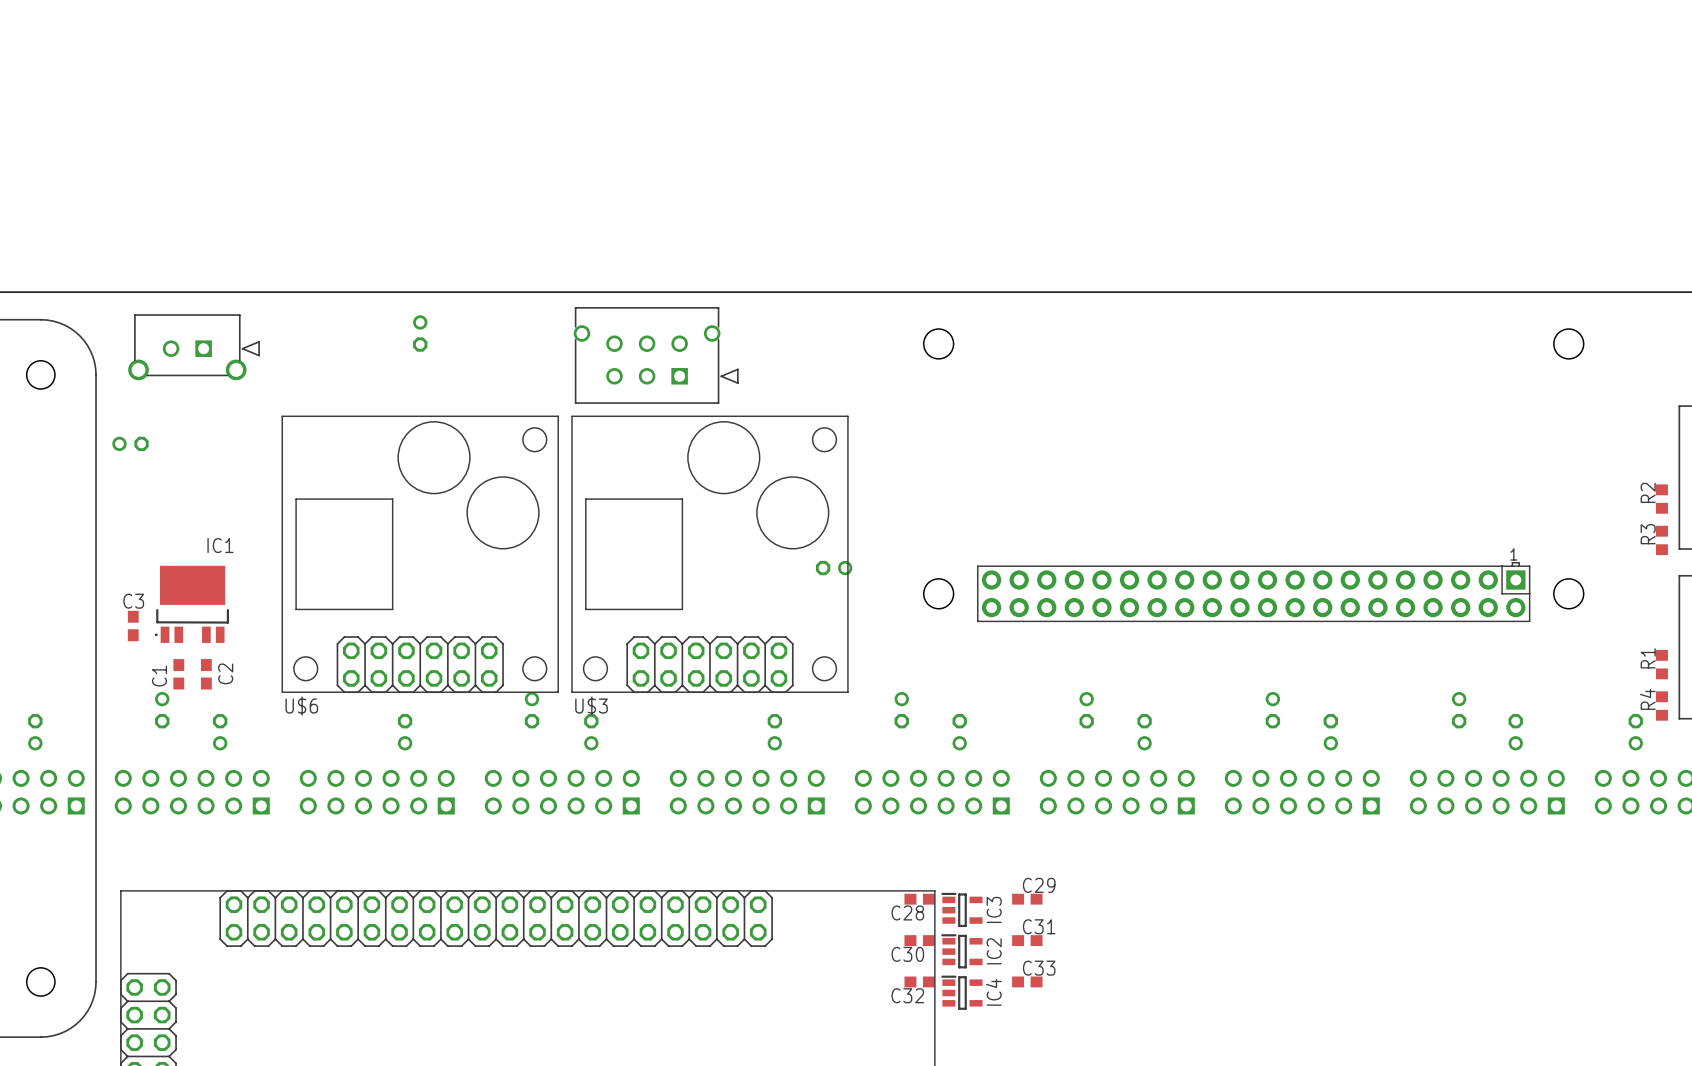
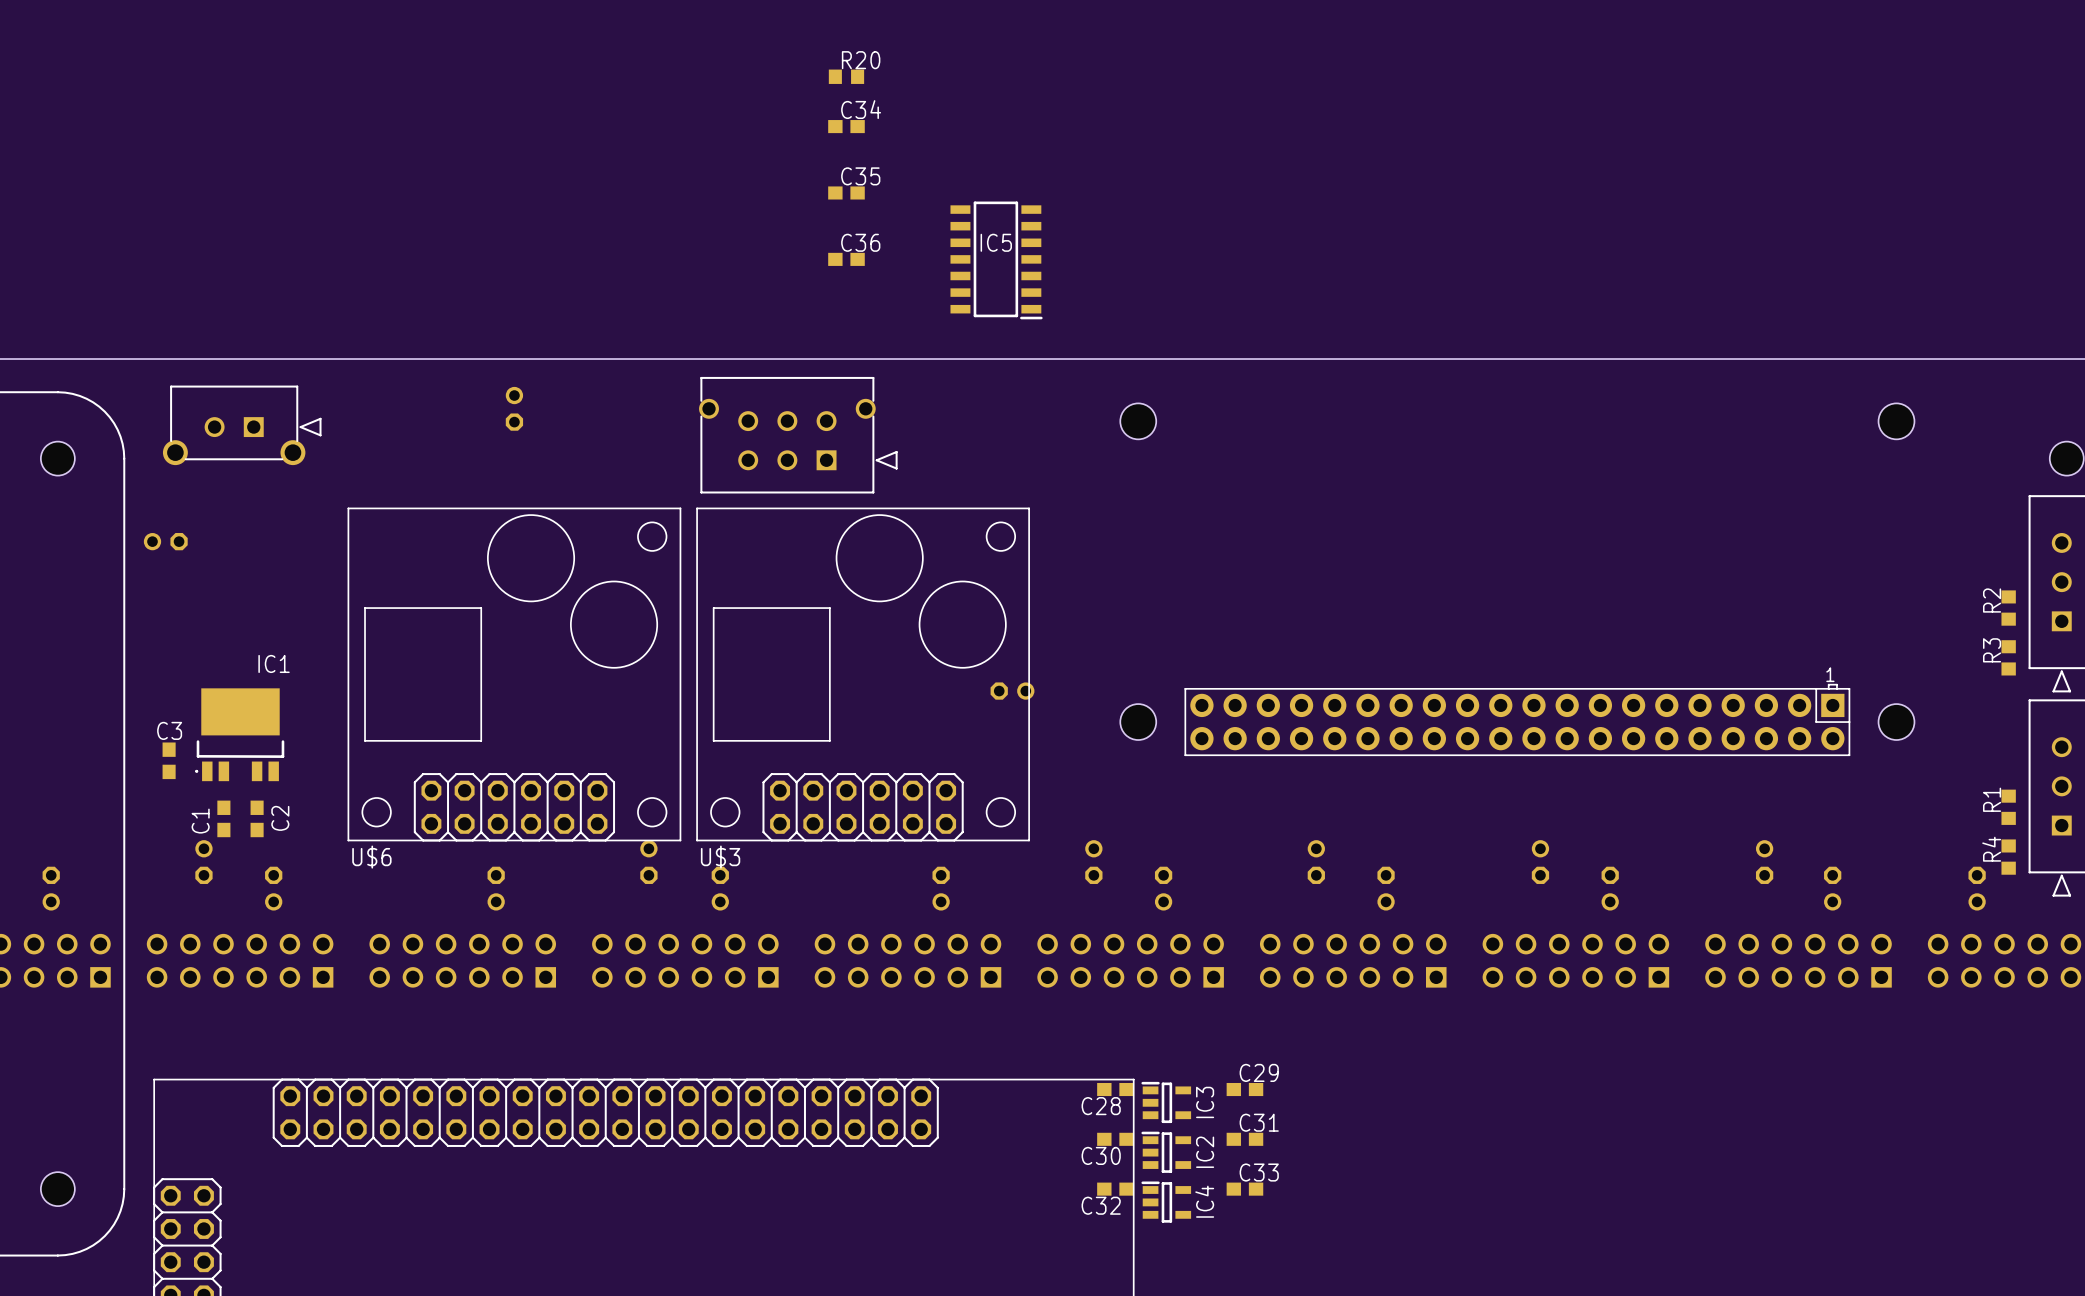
R20: none -> (846, 76)
C34: none -> (846, 126)
C35: none -> (846, 192)
C36: none -> (846, 259)
IC5: none -> (996, 260)

